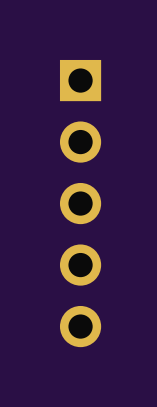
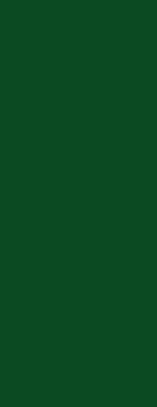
part: (80, 203) -> none

